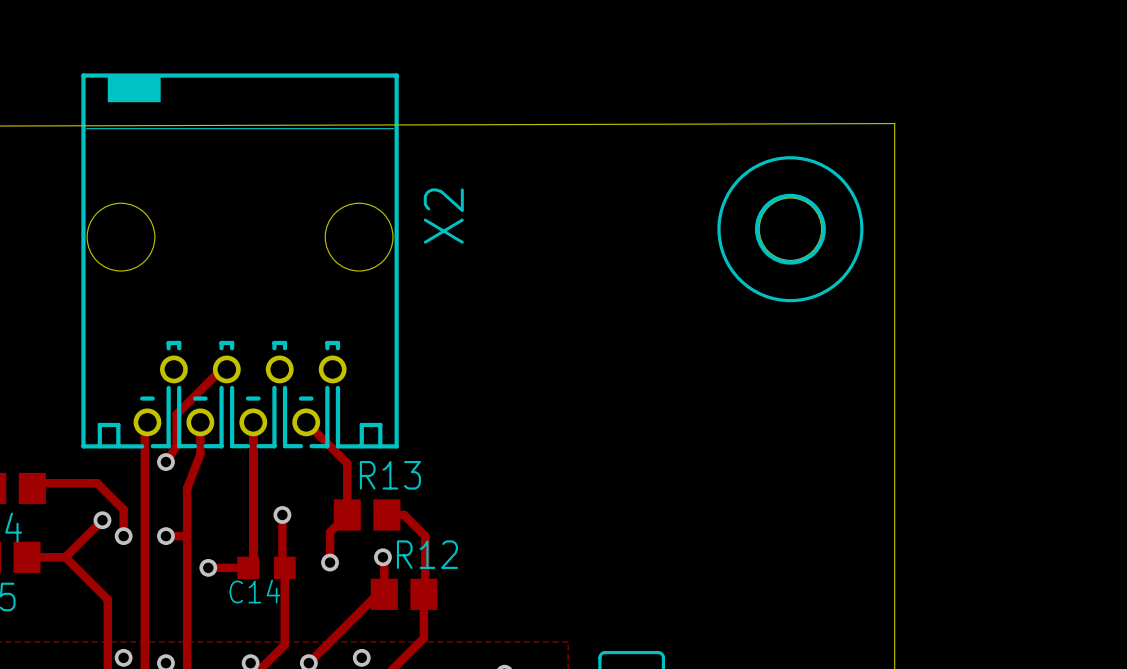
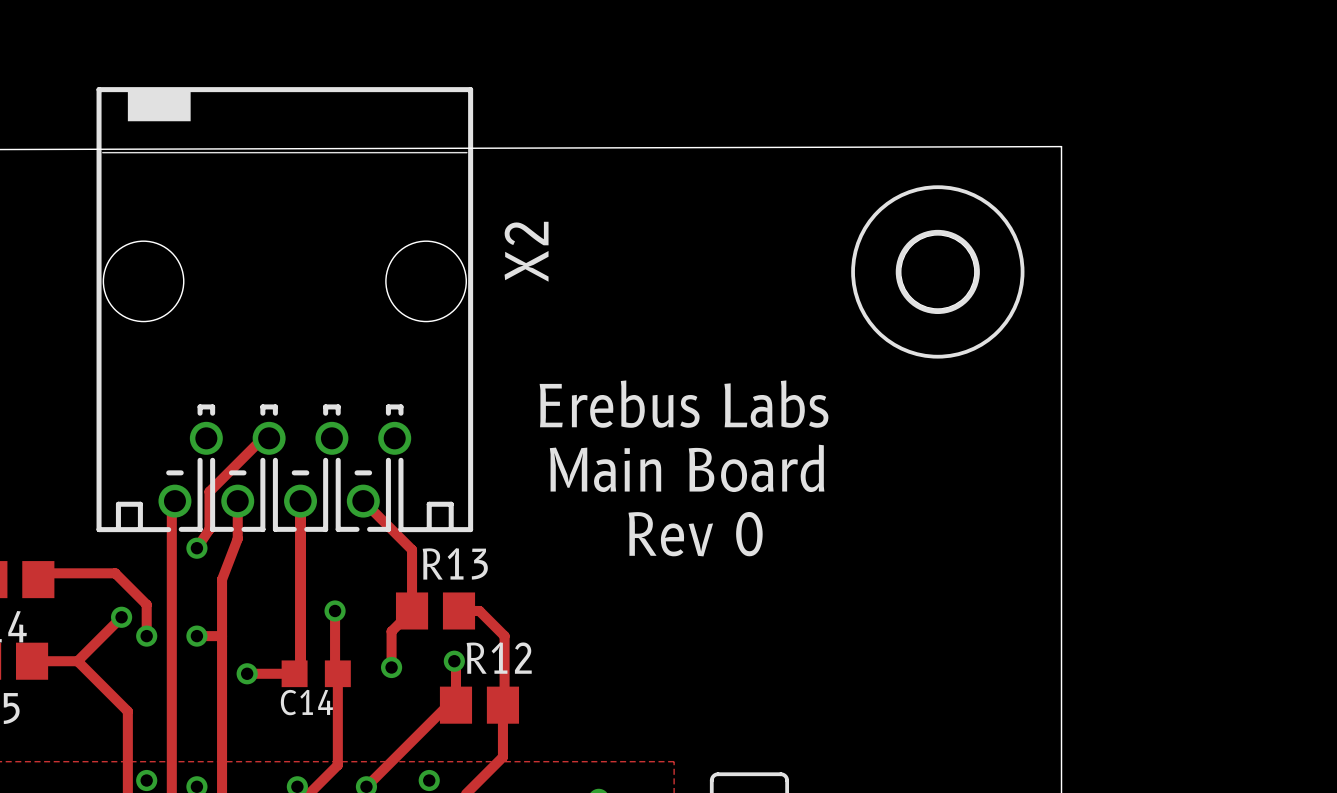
text: none -> Erebus Labs (684, 404)
text: none -> Main Board (687, 468)
text: none -> Rev 0 (695, 534)

